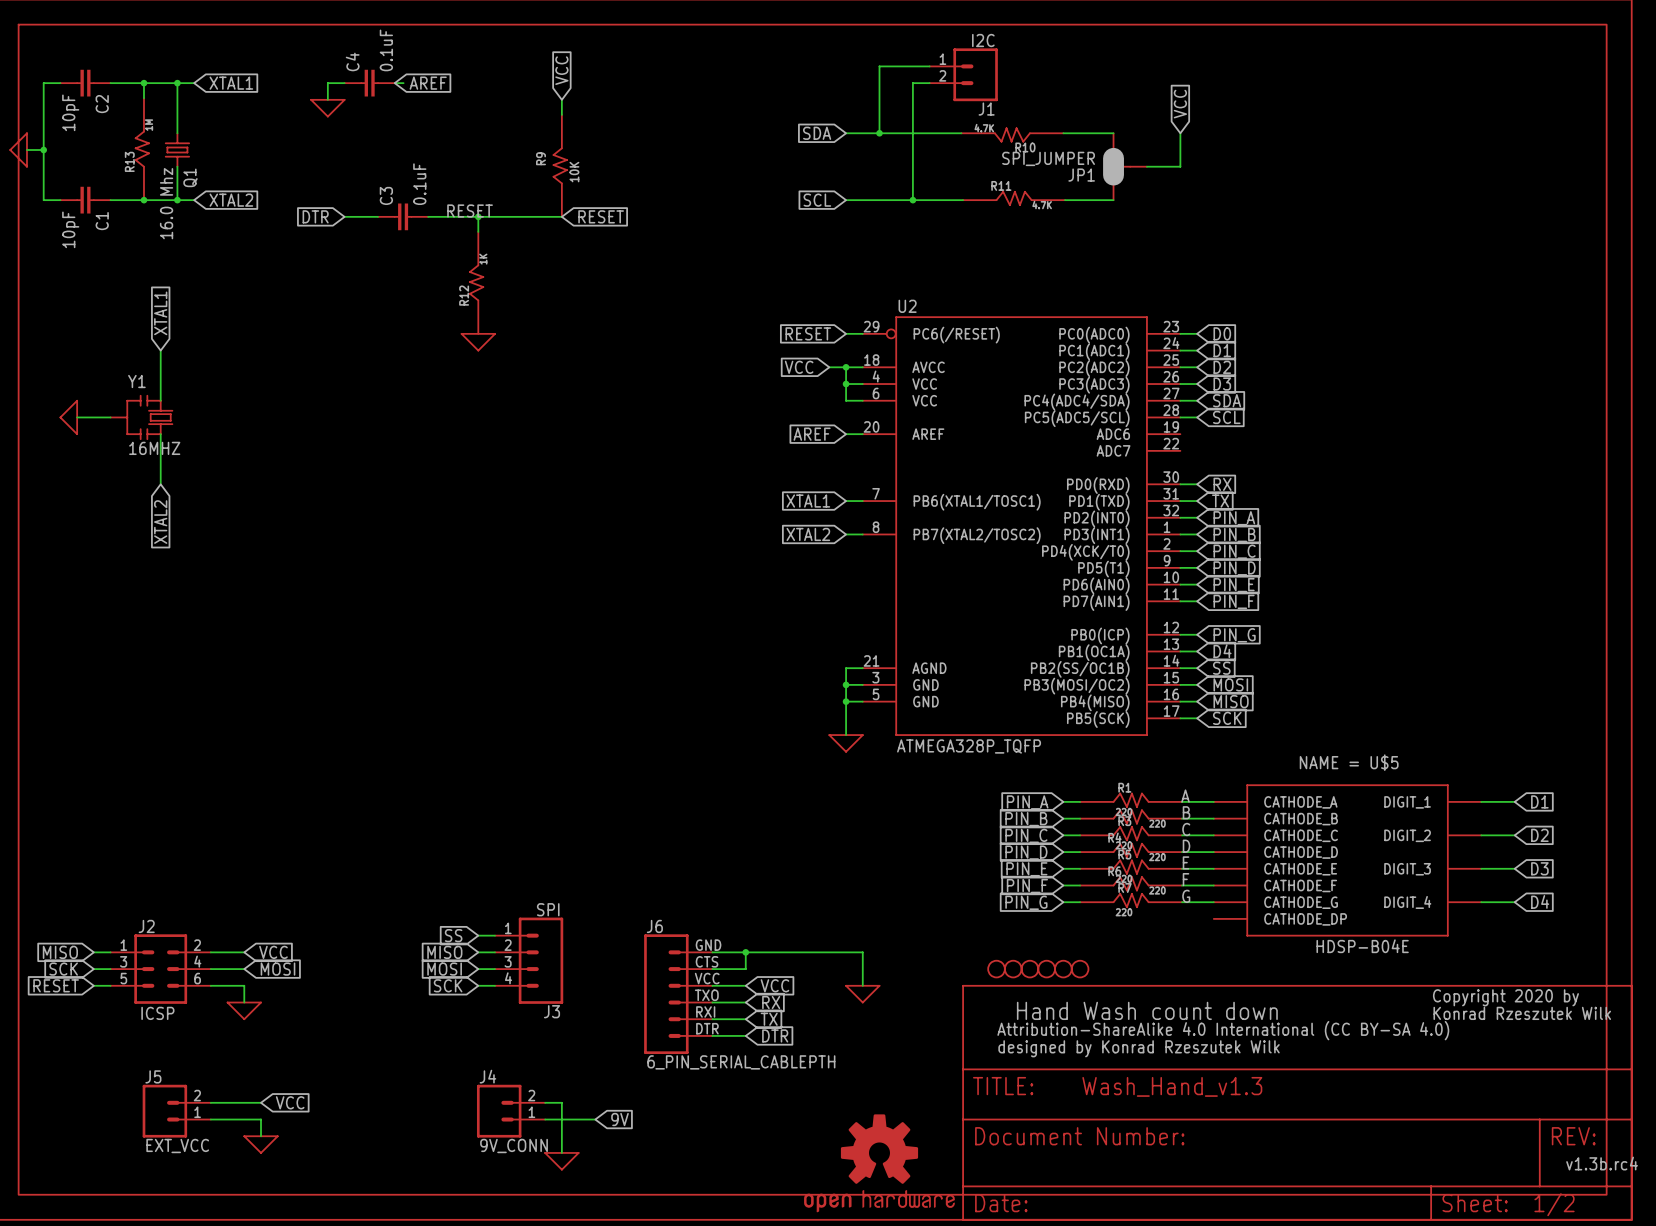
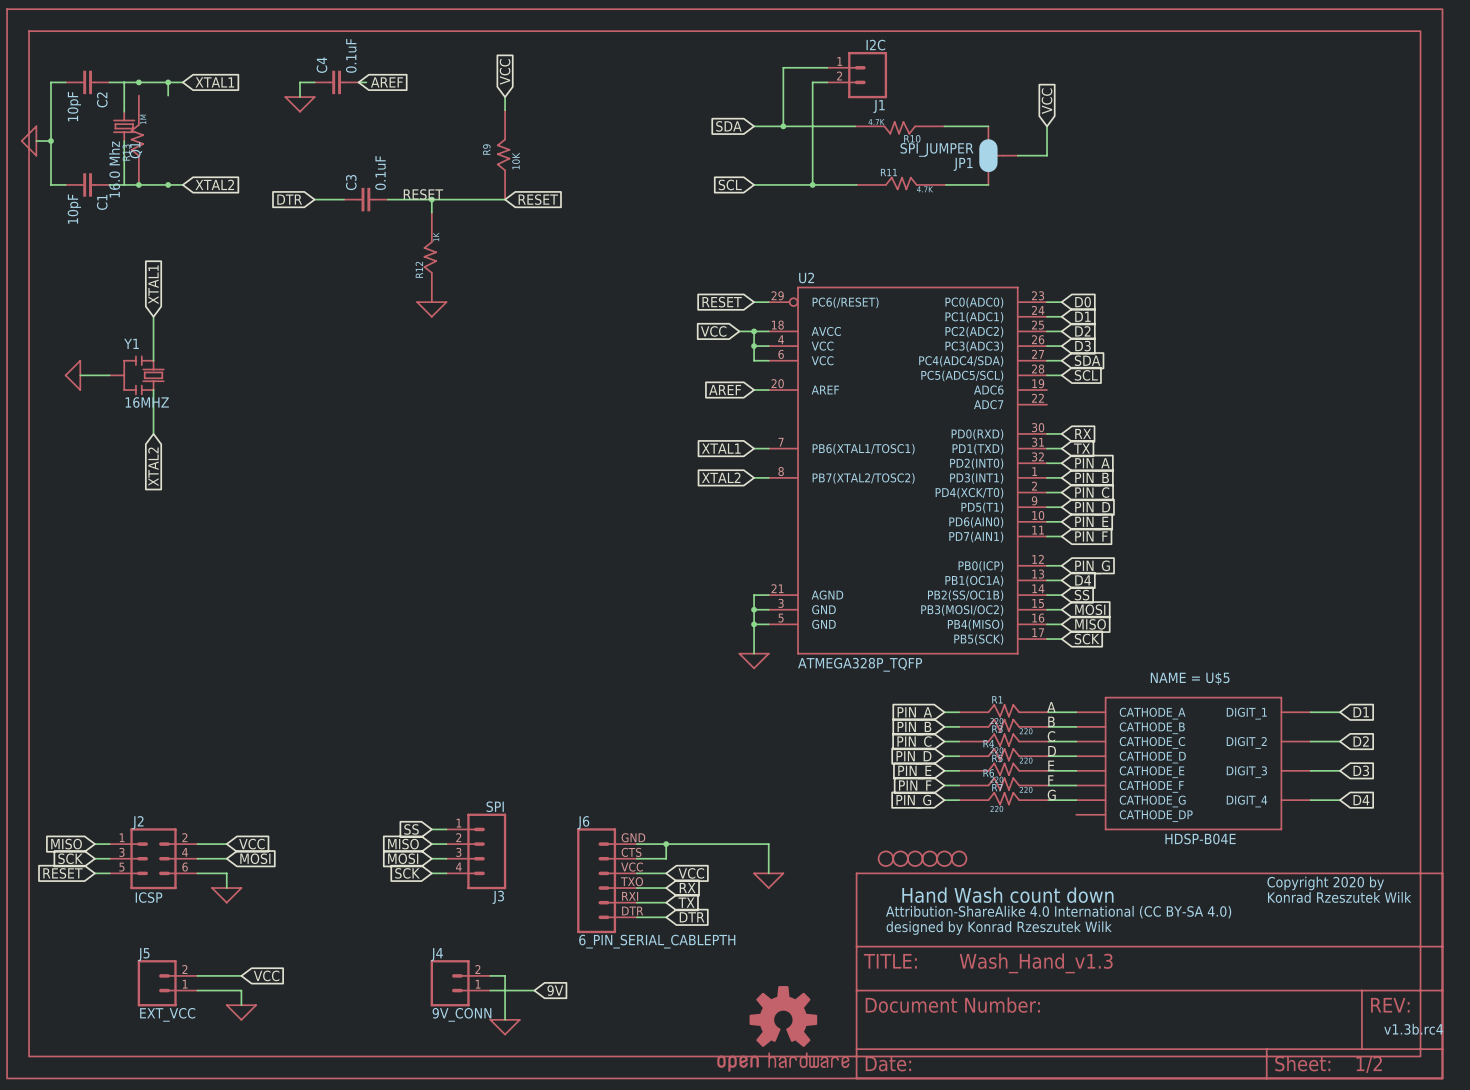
wire: (143, 83) (143, 98) -> none
wire: (177, 98) (177, 133) -> none
wire: none -> (124, 141) (124, 184)
Q1 position: (177, 150) -> (124, 126)
wire: (177, 166) (177, 200) -> (124, 82) (124, 111)

